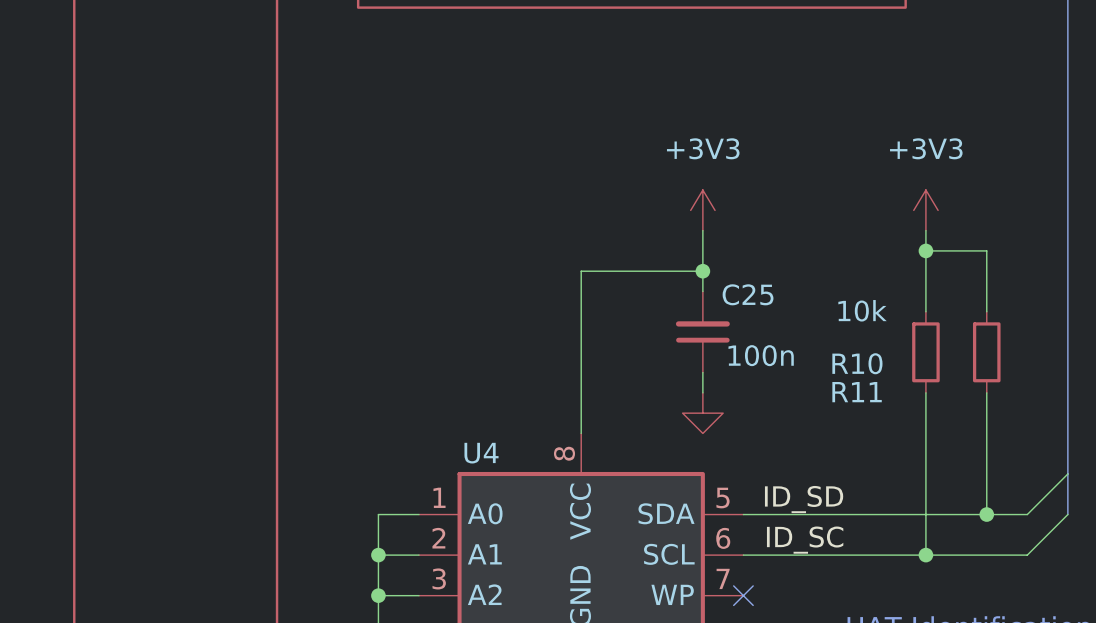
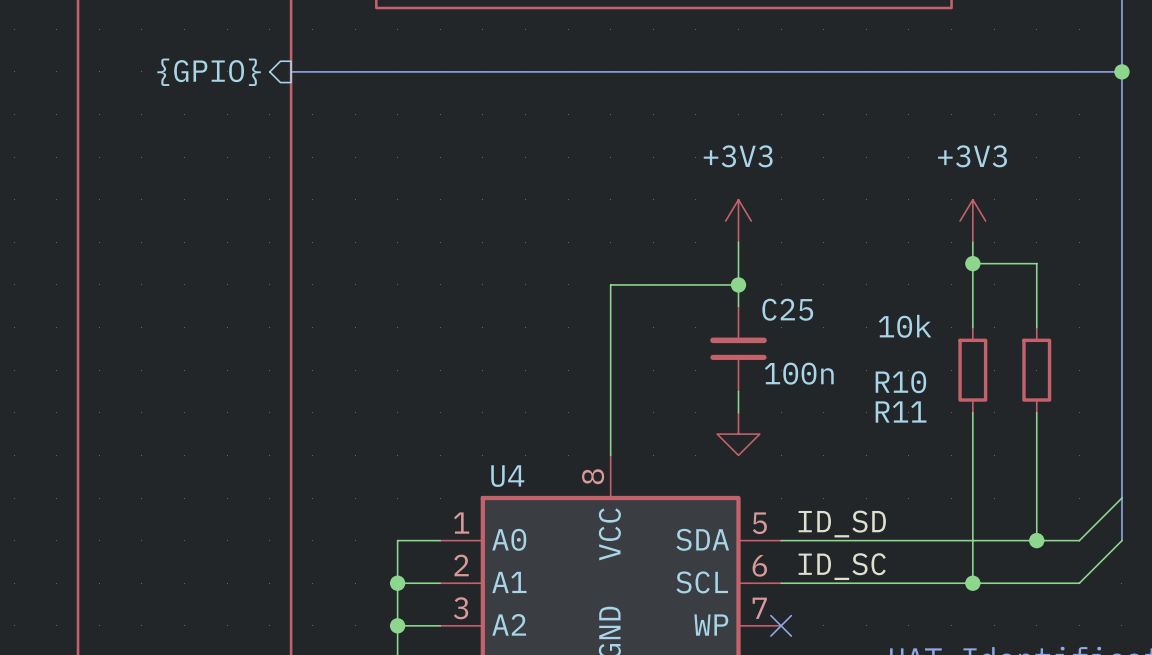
bus: none -> (291, 71) (1121, 71)
junction: none -> (1121, 71)
sheet pin: none -> {GPIO} (209, 72)

